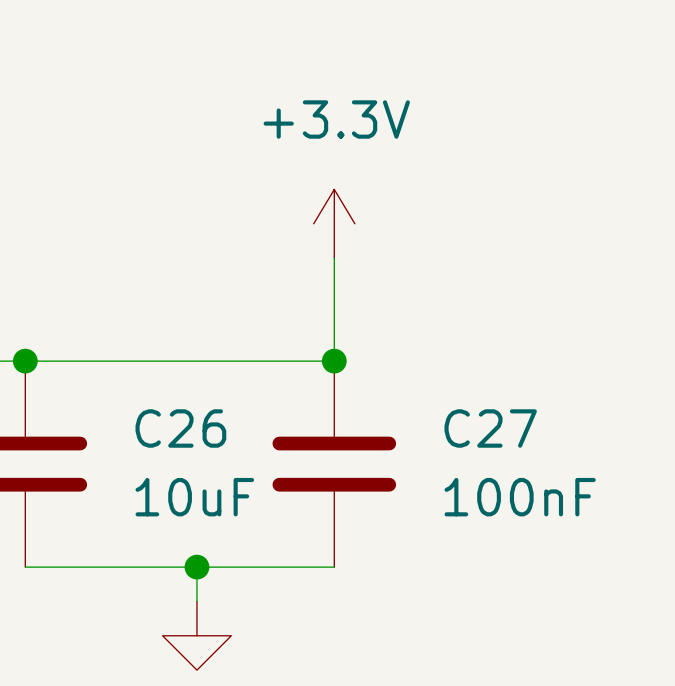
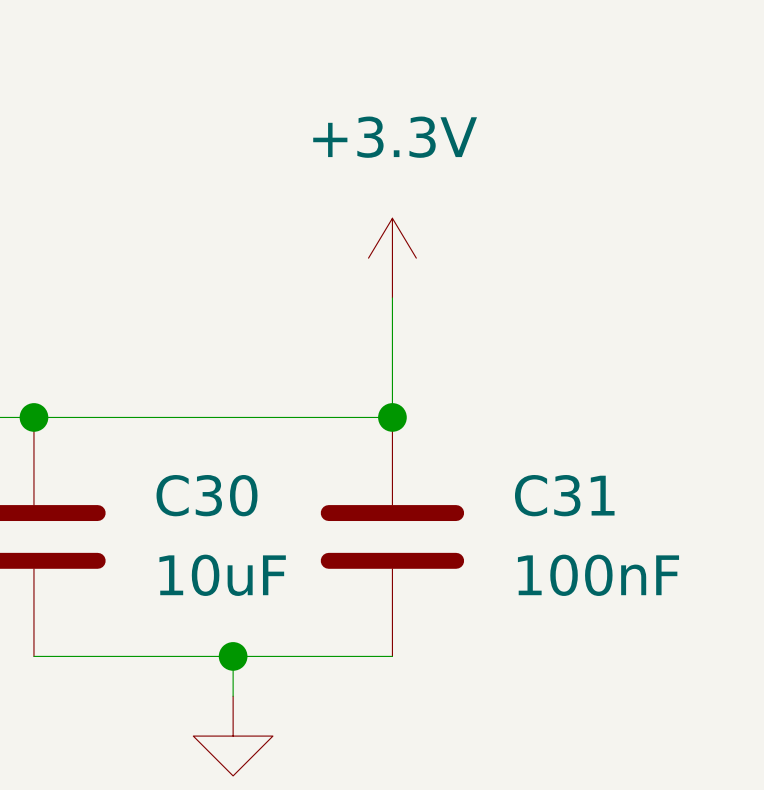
C26 name: C26 (180, 428) -> C30 (207, 495)
C27 name: C27 (490, 428) -> C31 (564, 495)

